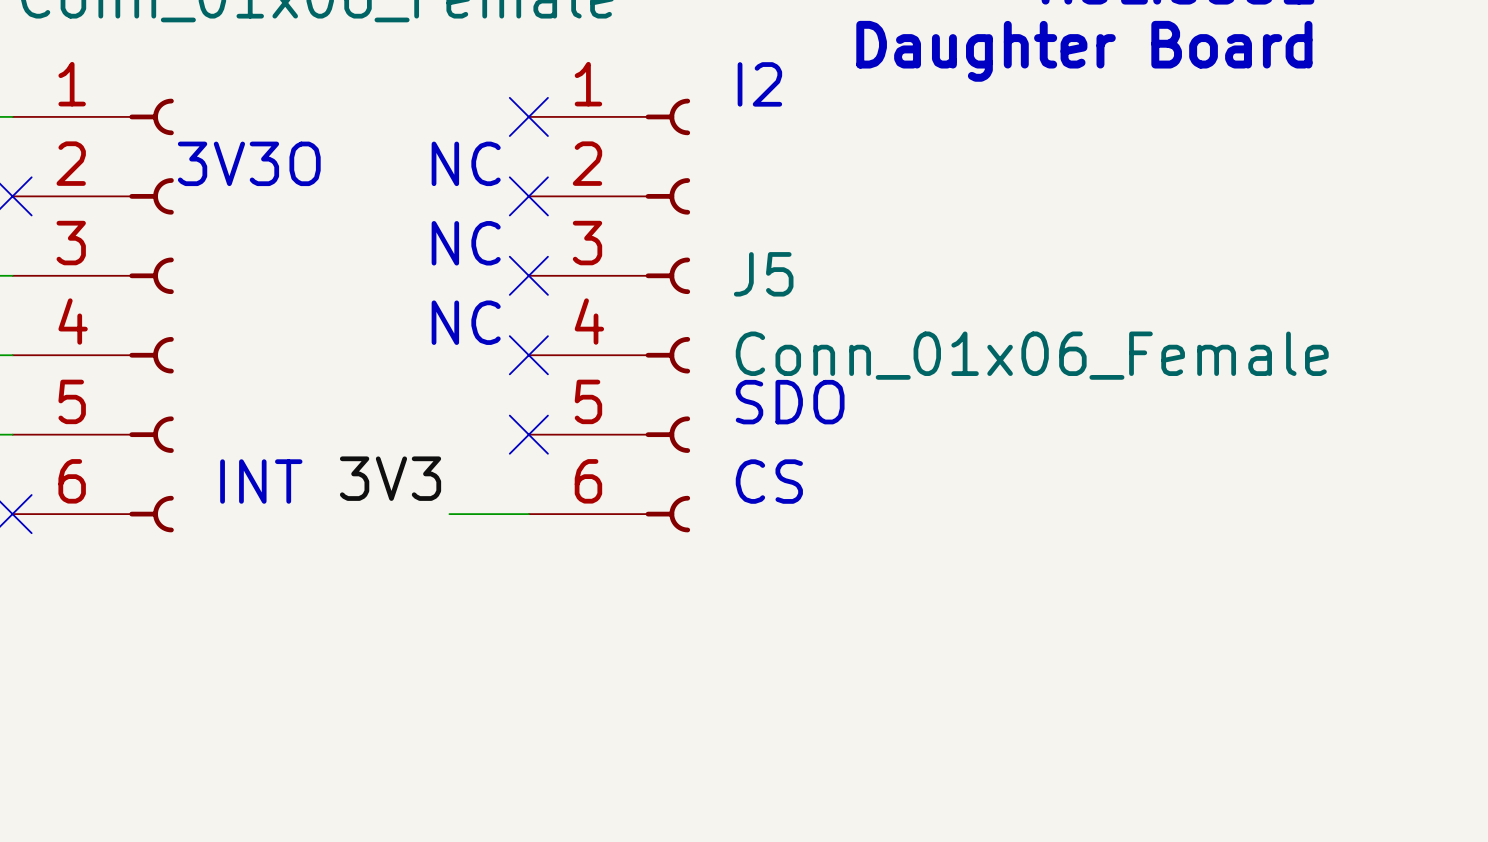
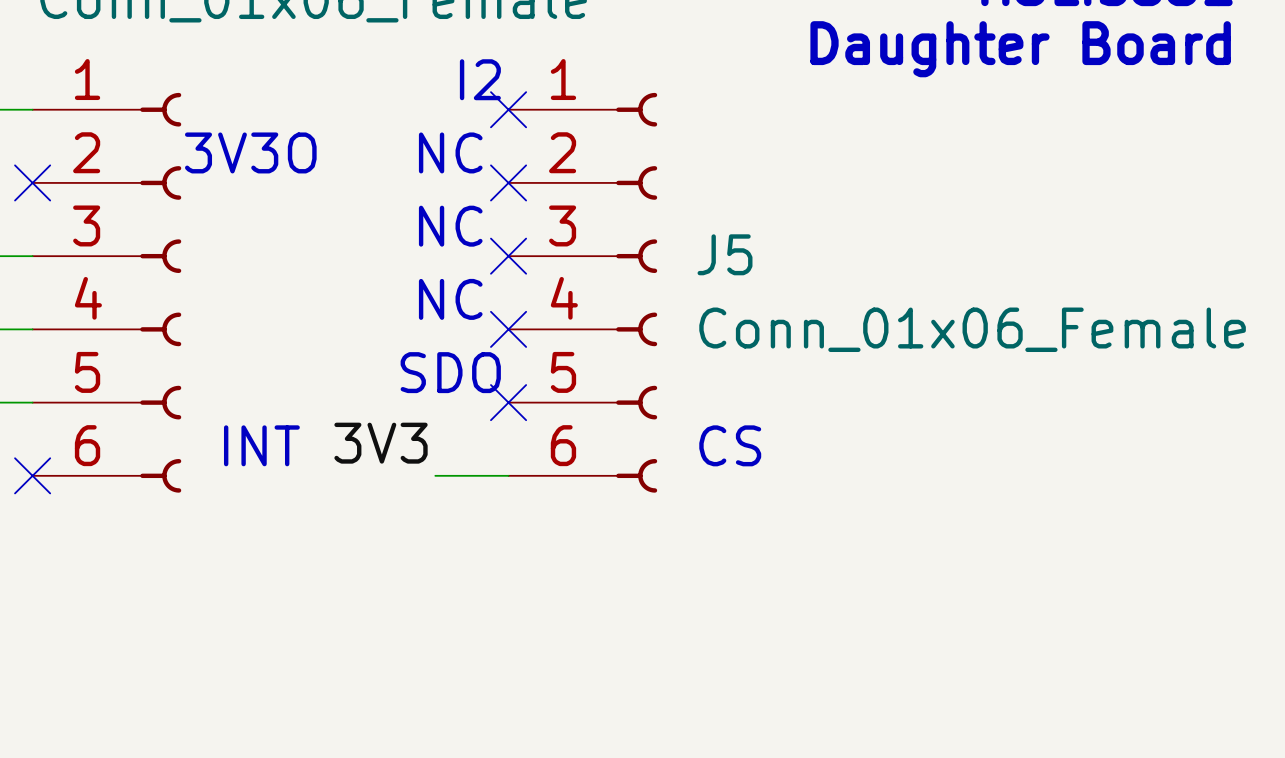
text position: I2 (759, 84) -> I2 (480, 79)
text position: SDO (790, 402) -> SDO (450, 372)

